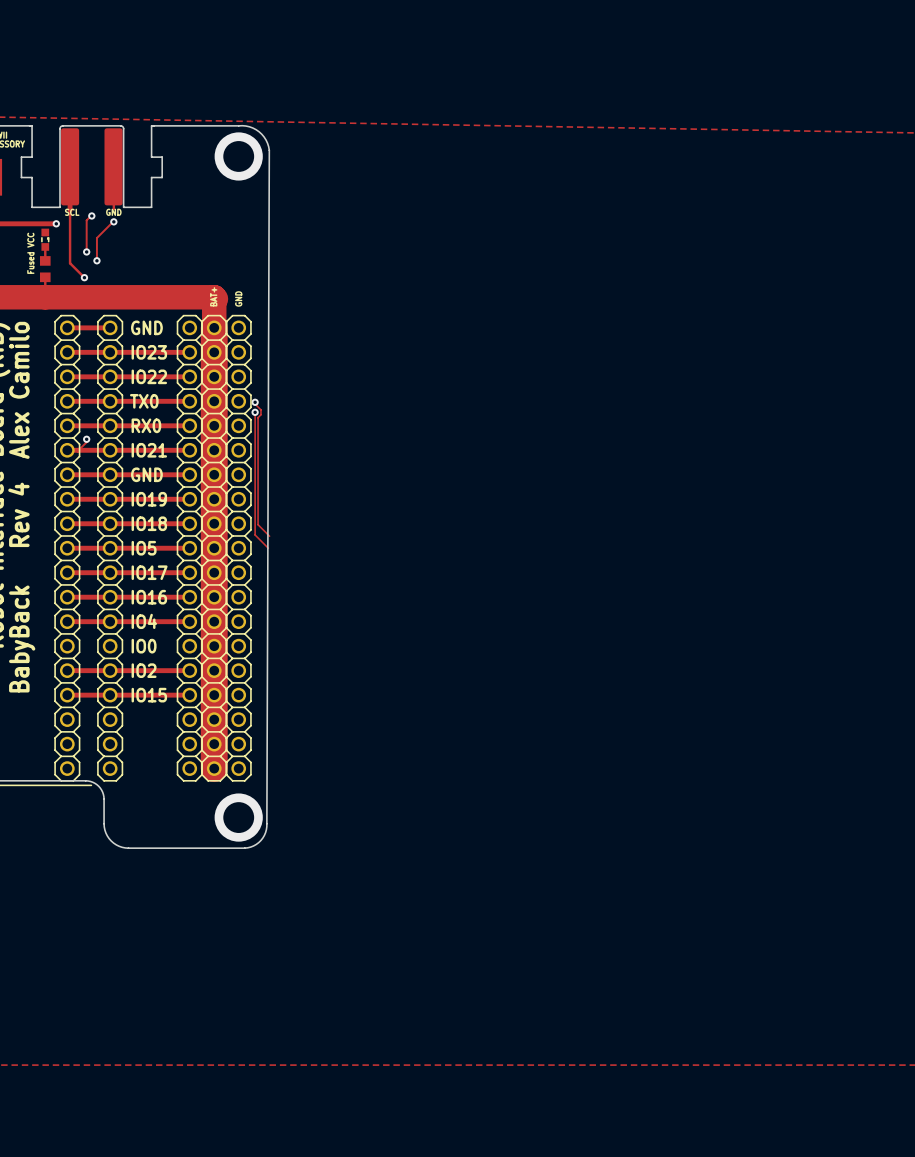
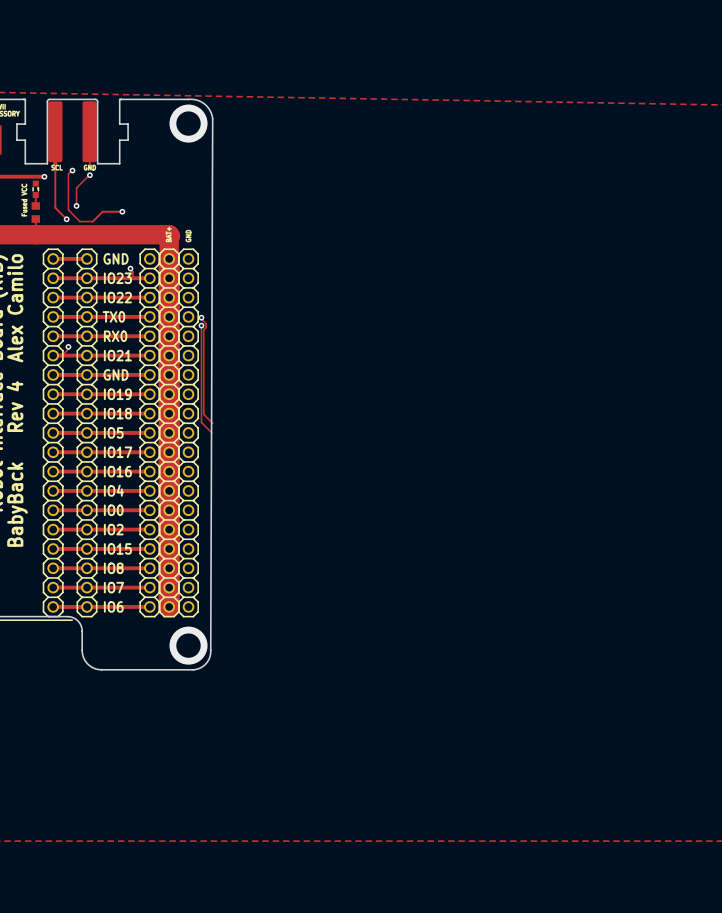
track: none -> (68, 198) (68, 210) (80, 221) (92, 221) (102, 211) (122, 211)
via: (86, 251) -> none
via: none -> (122, 211)
track: none -> (130, 268) (132, 278)
via: none -> (130, 268)
track: none -> (53, 510) (149, 510)
track: none -> (53, 568) (149, 568)
text: none -> IO8 (113, 568)
track: none -> (53, 587) (149, 587)
text: none -> IO7 (113, 587)
track: none -> (53, 606) (149, 606)
text: none -> IO6 (113, 606)

